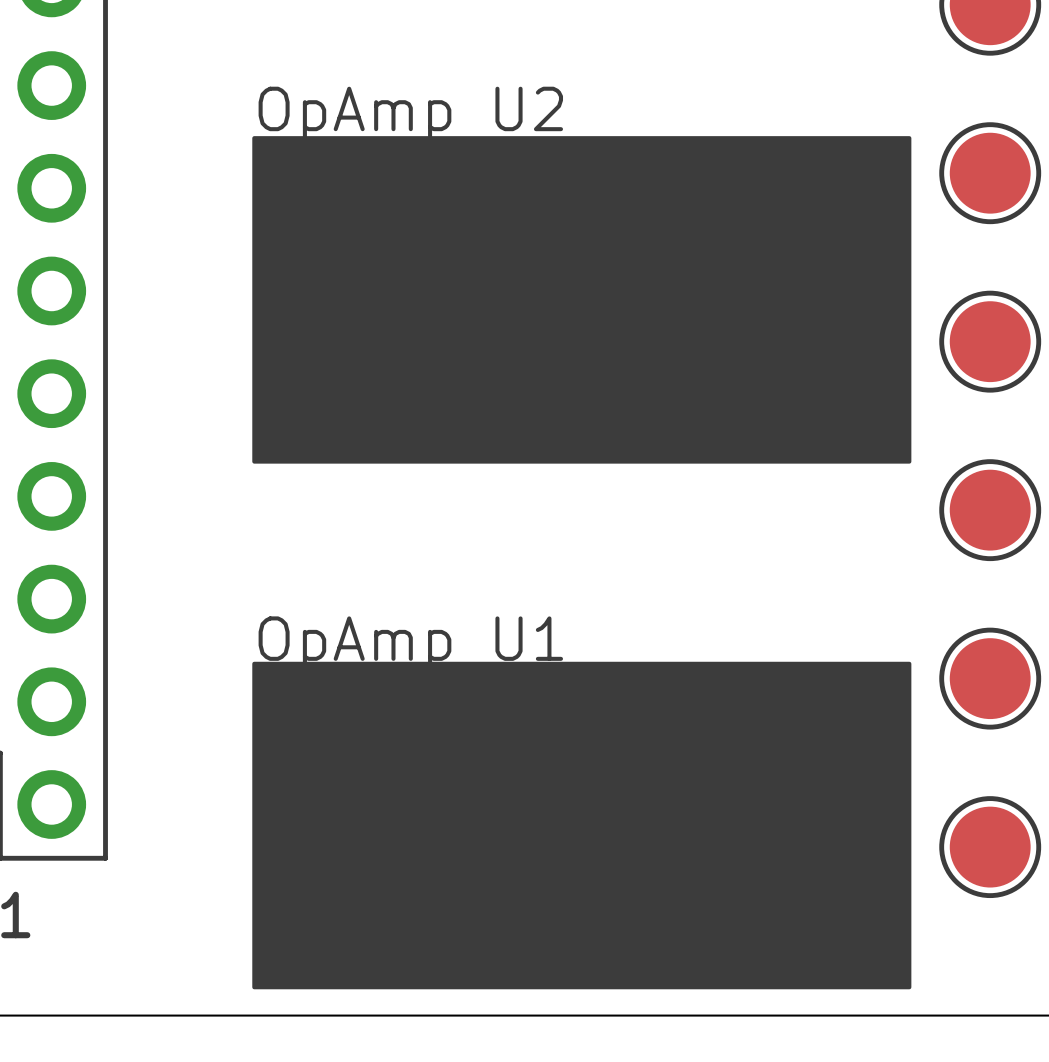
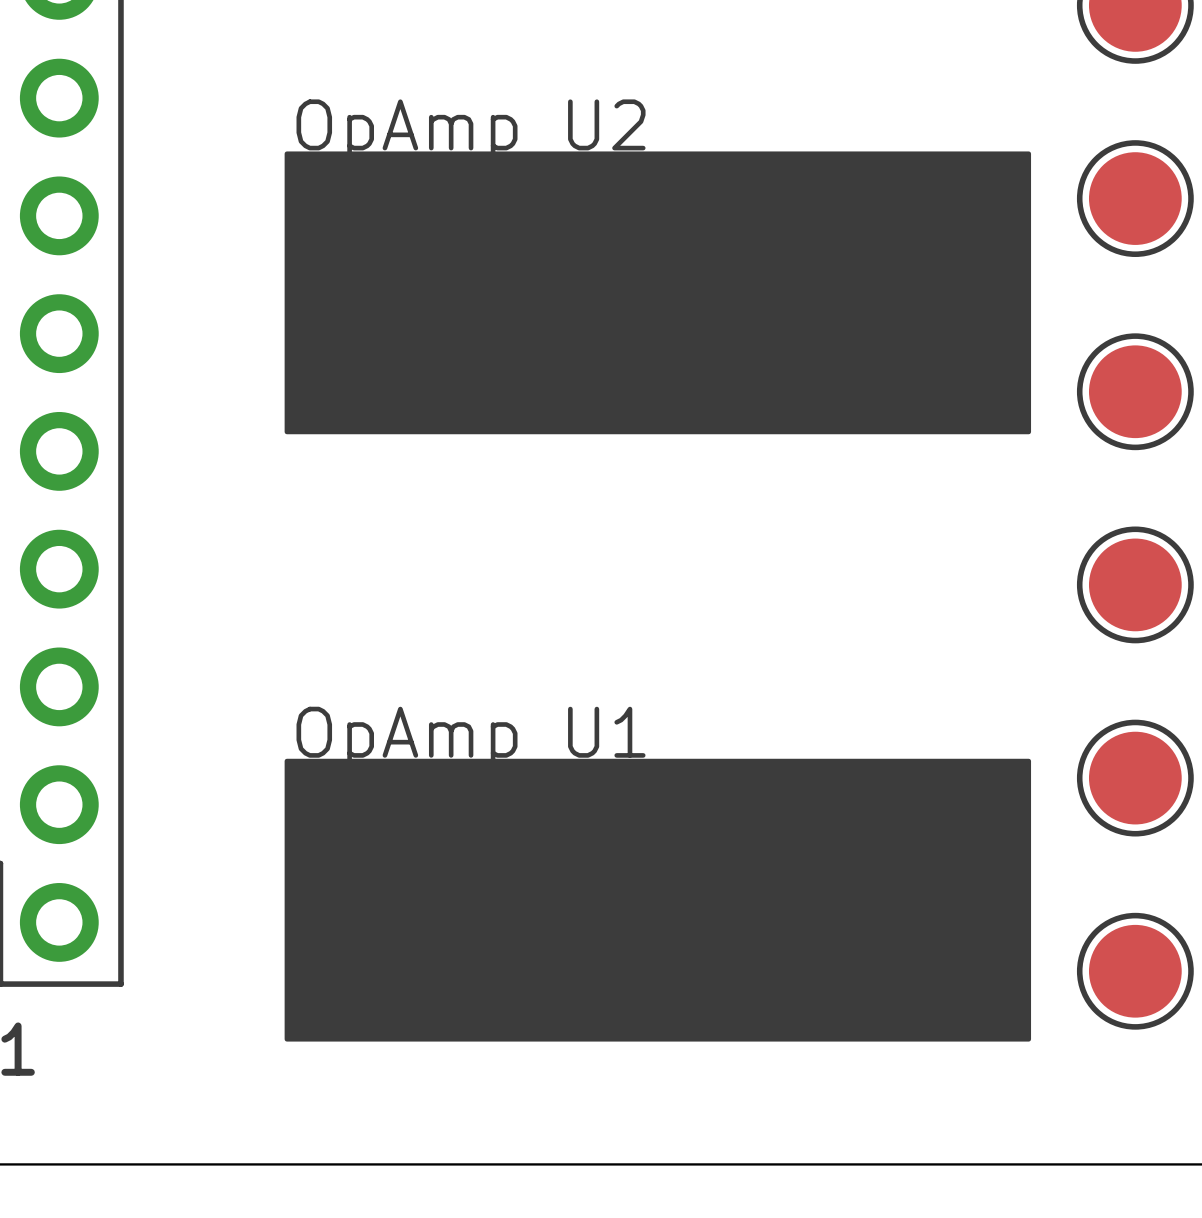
drawing: none -> [284, 151, 1032, 435]
drawing: [252, 136, 912, 464] -> none
drawing: none -> [284, 758, 1032, 1042]
drawing: [252, 661, 912, 990] -> none

